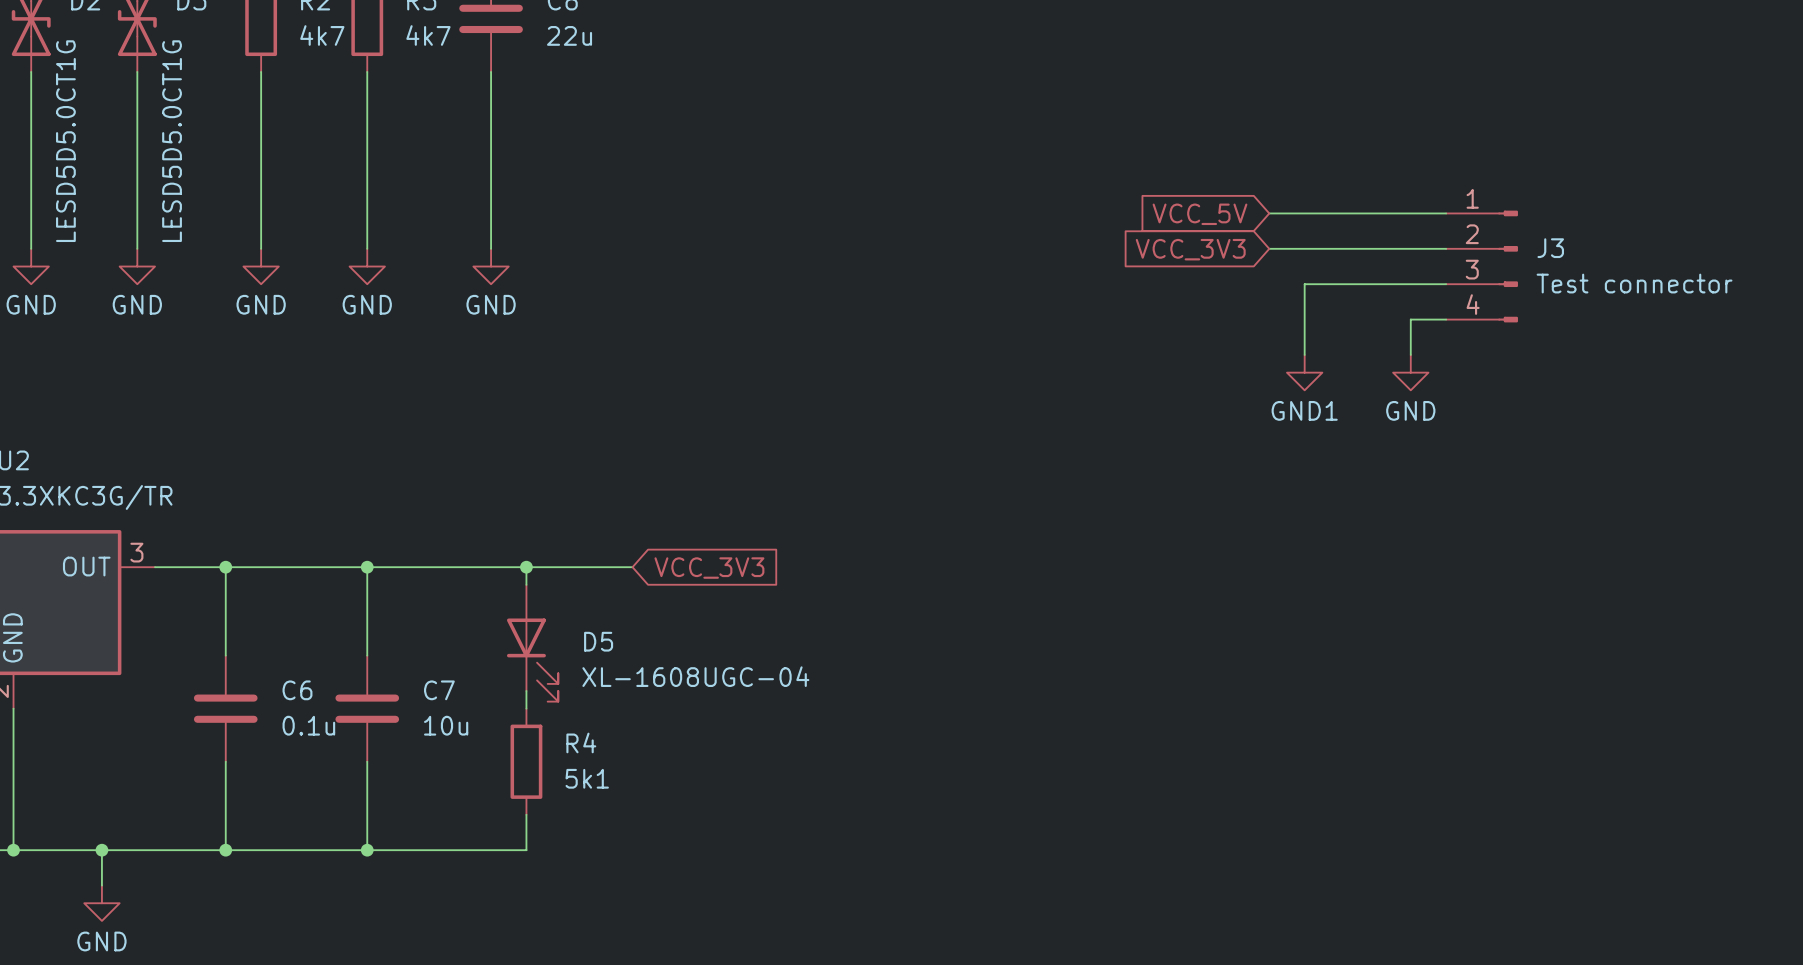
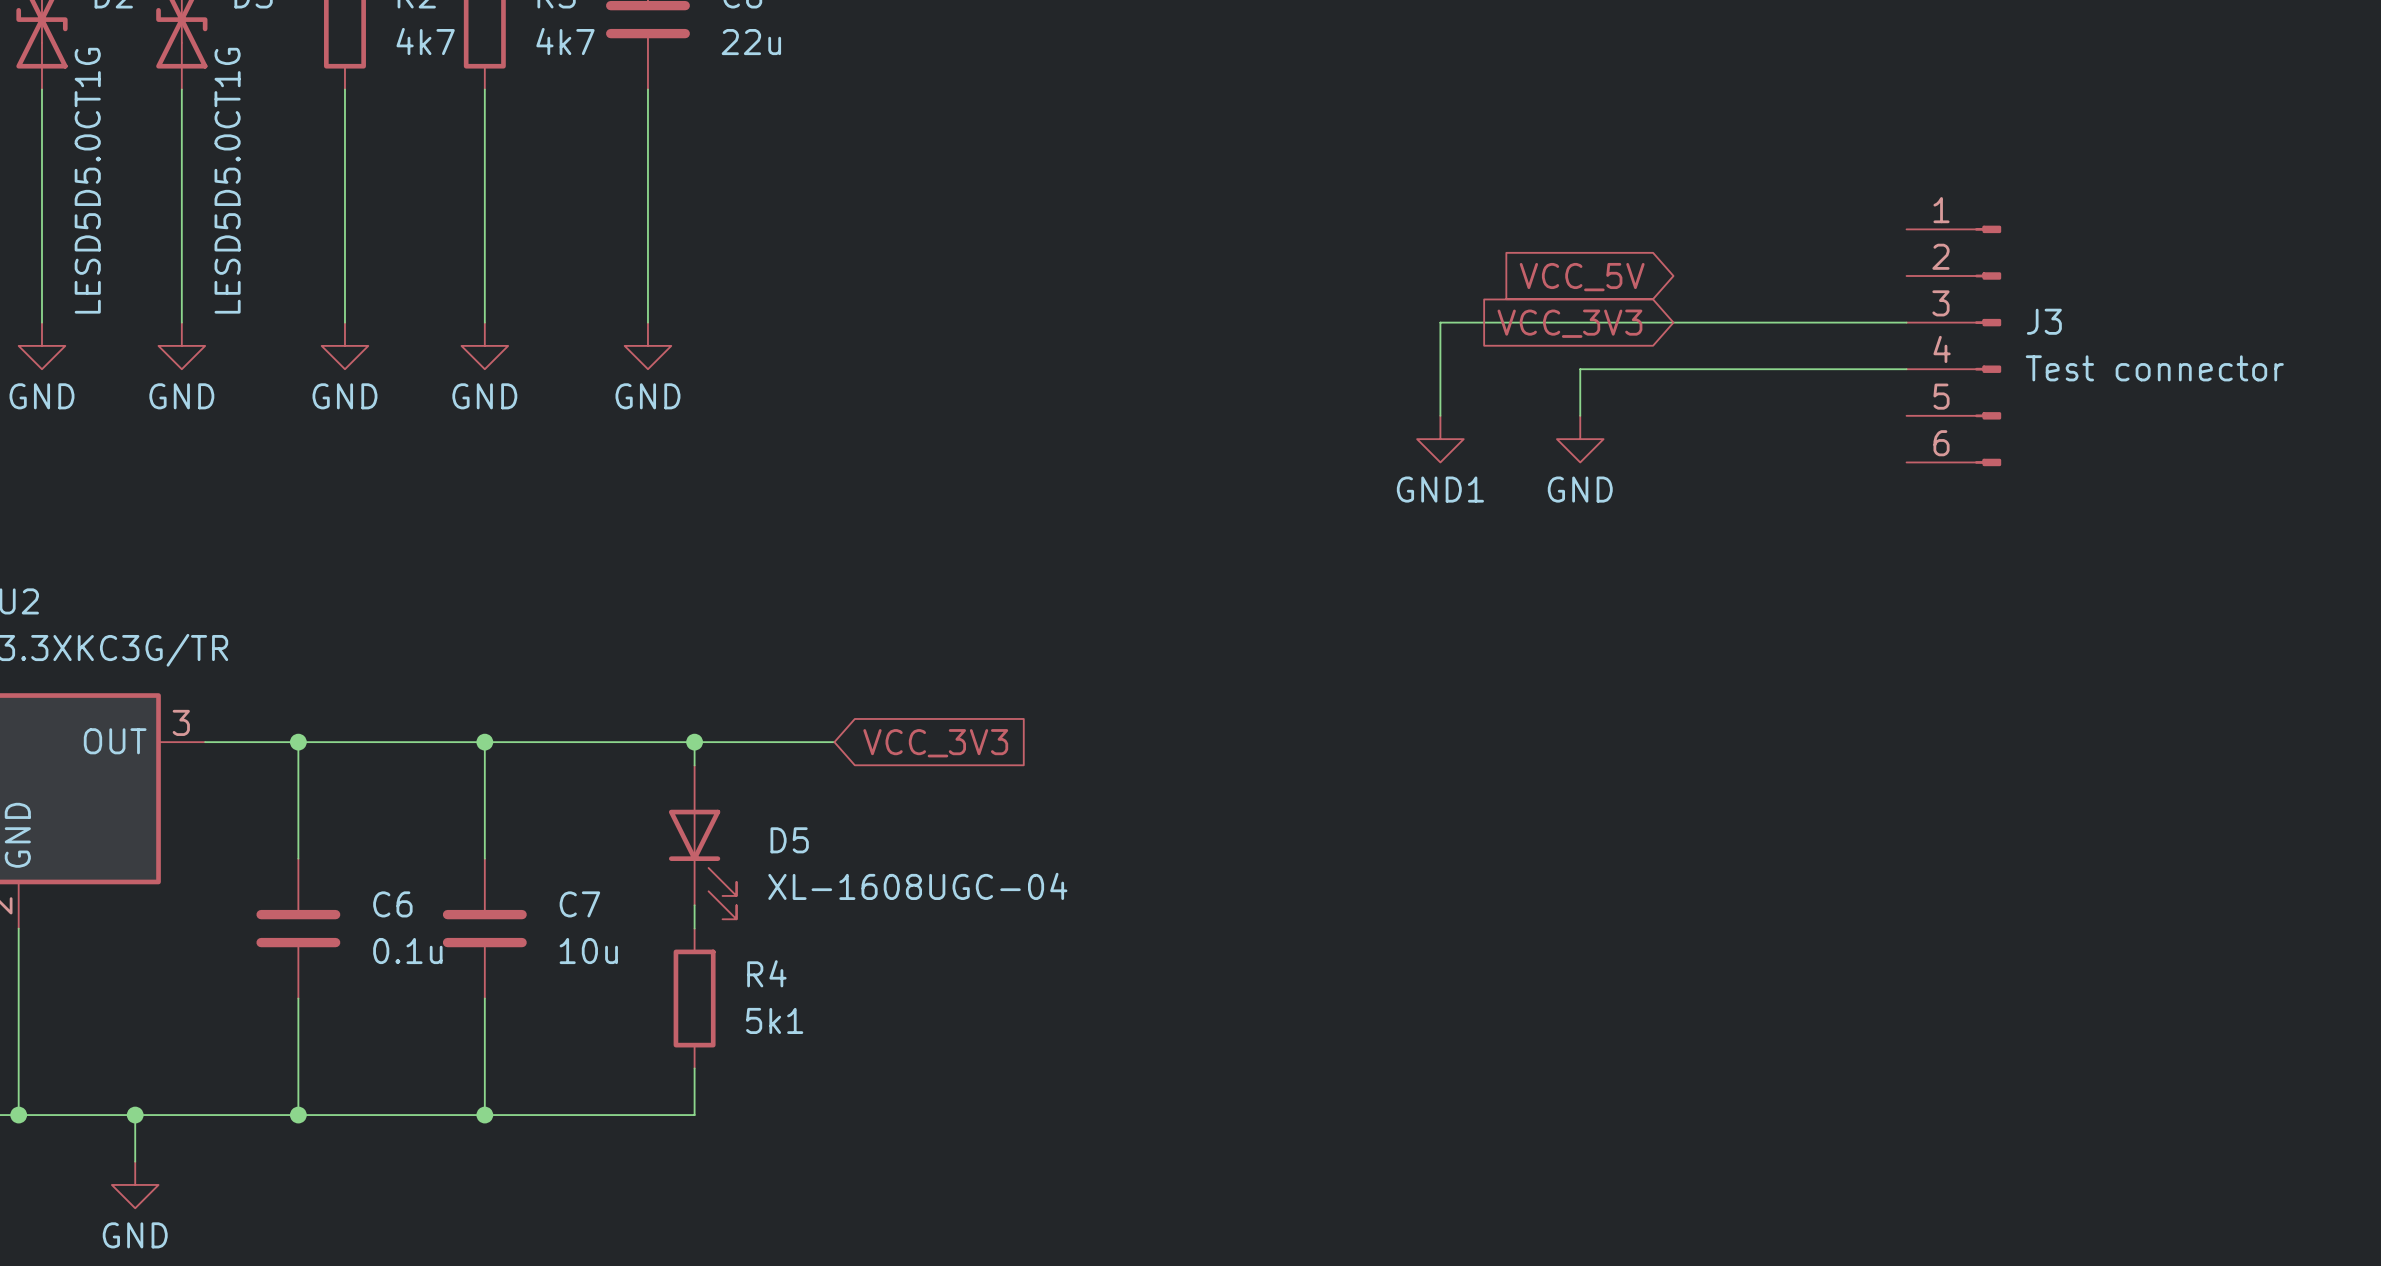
J3 symbol: [1446, 210, 1518, 323] -> [1906, 225, 2002, 467]
wire: (1269, 213) (1446, 213) -> none
wire: none -> (1673, 322) (1440, 322) (1440, 415)
wire: (1304, 284) (1304, 354) -> (1720, 369) (1580, 369) (1580, 415)
wire: (1446, 319) (1410, 319) (1410, 354) -> none
power symbol position: GND1 (1304, 372) -> GND1 (1440, 439)
power symbol position: GND (1410, 372) -> GND (1580, 439)

